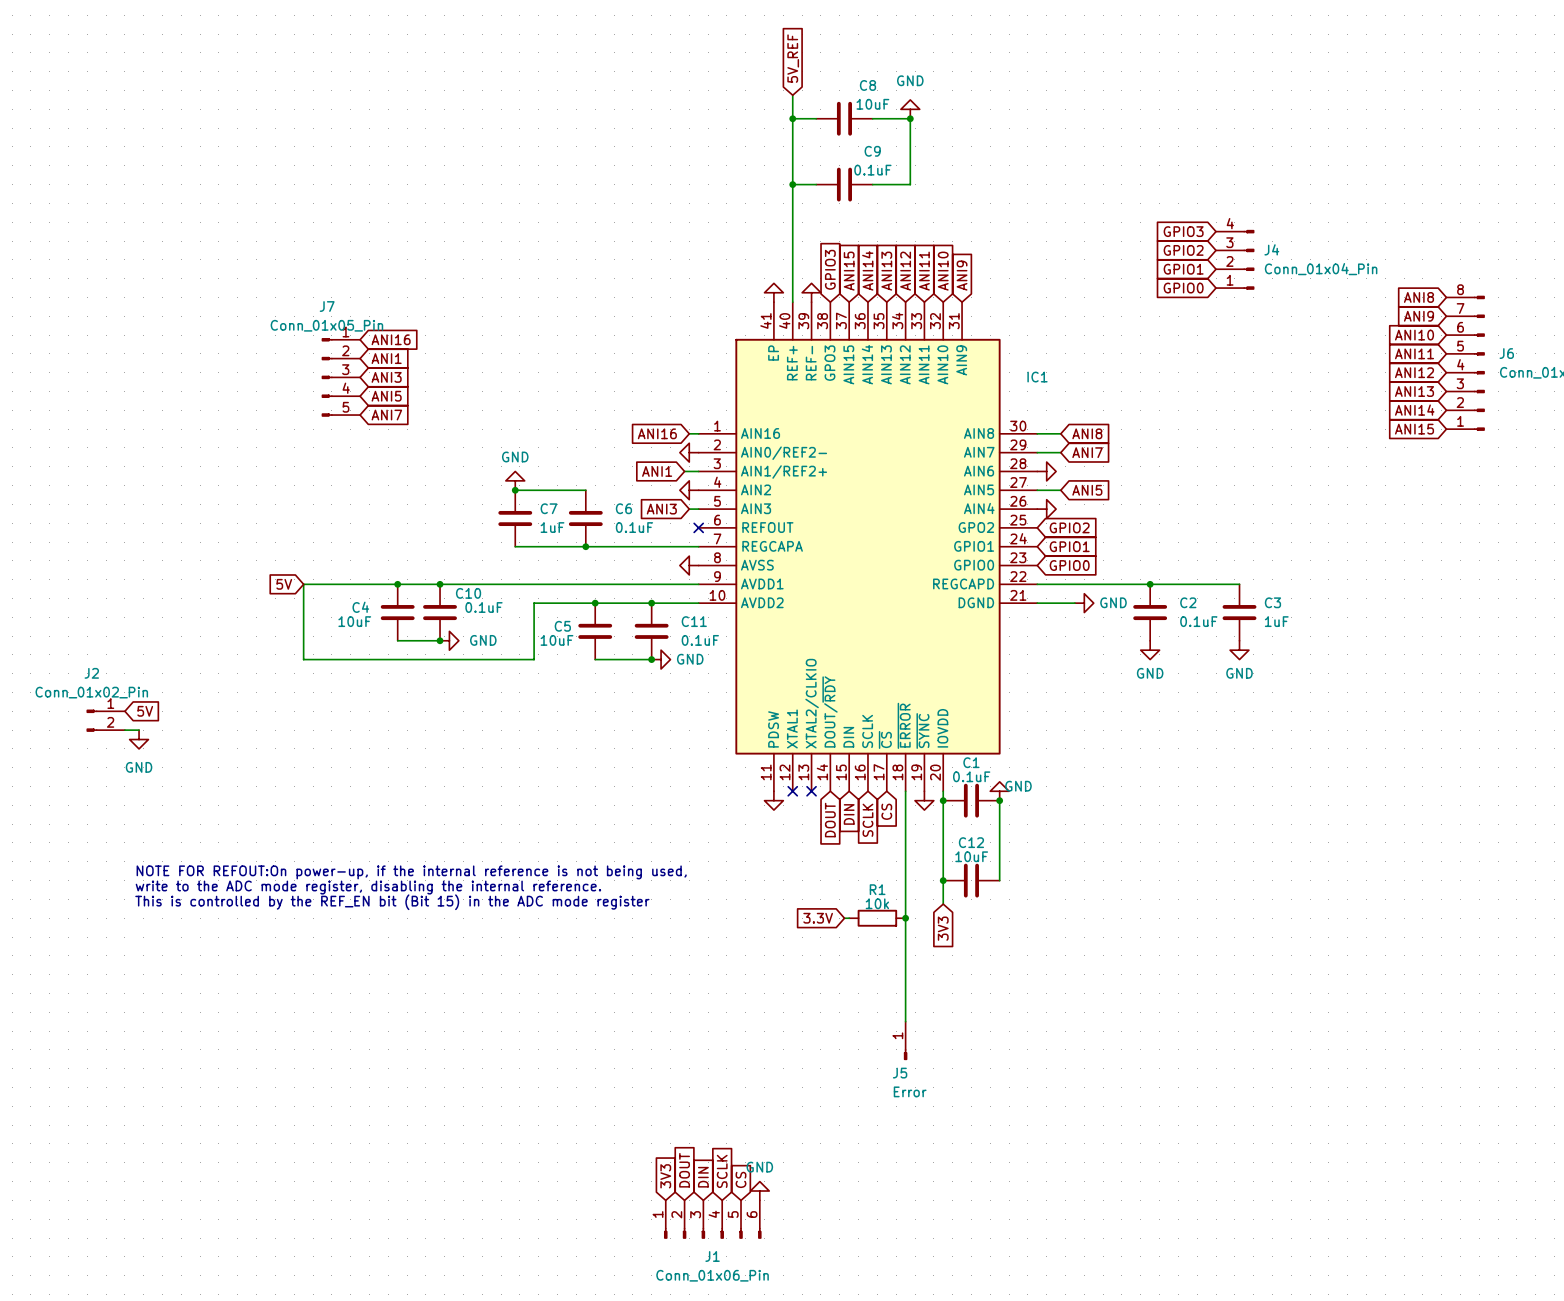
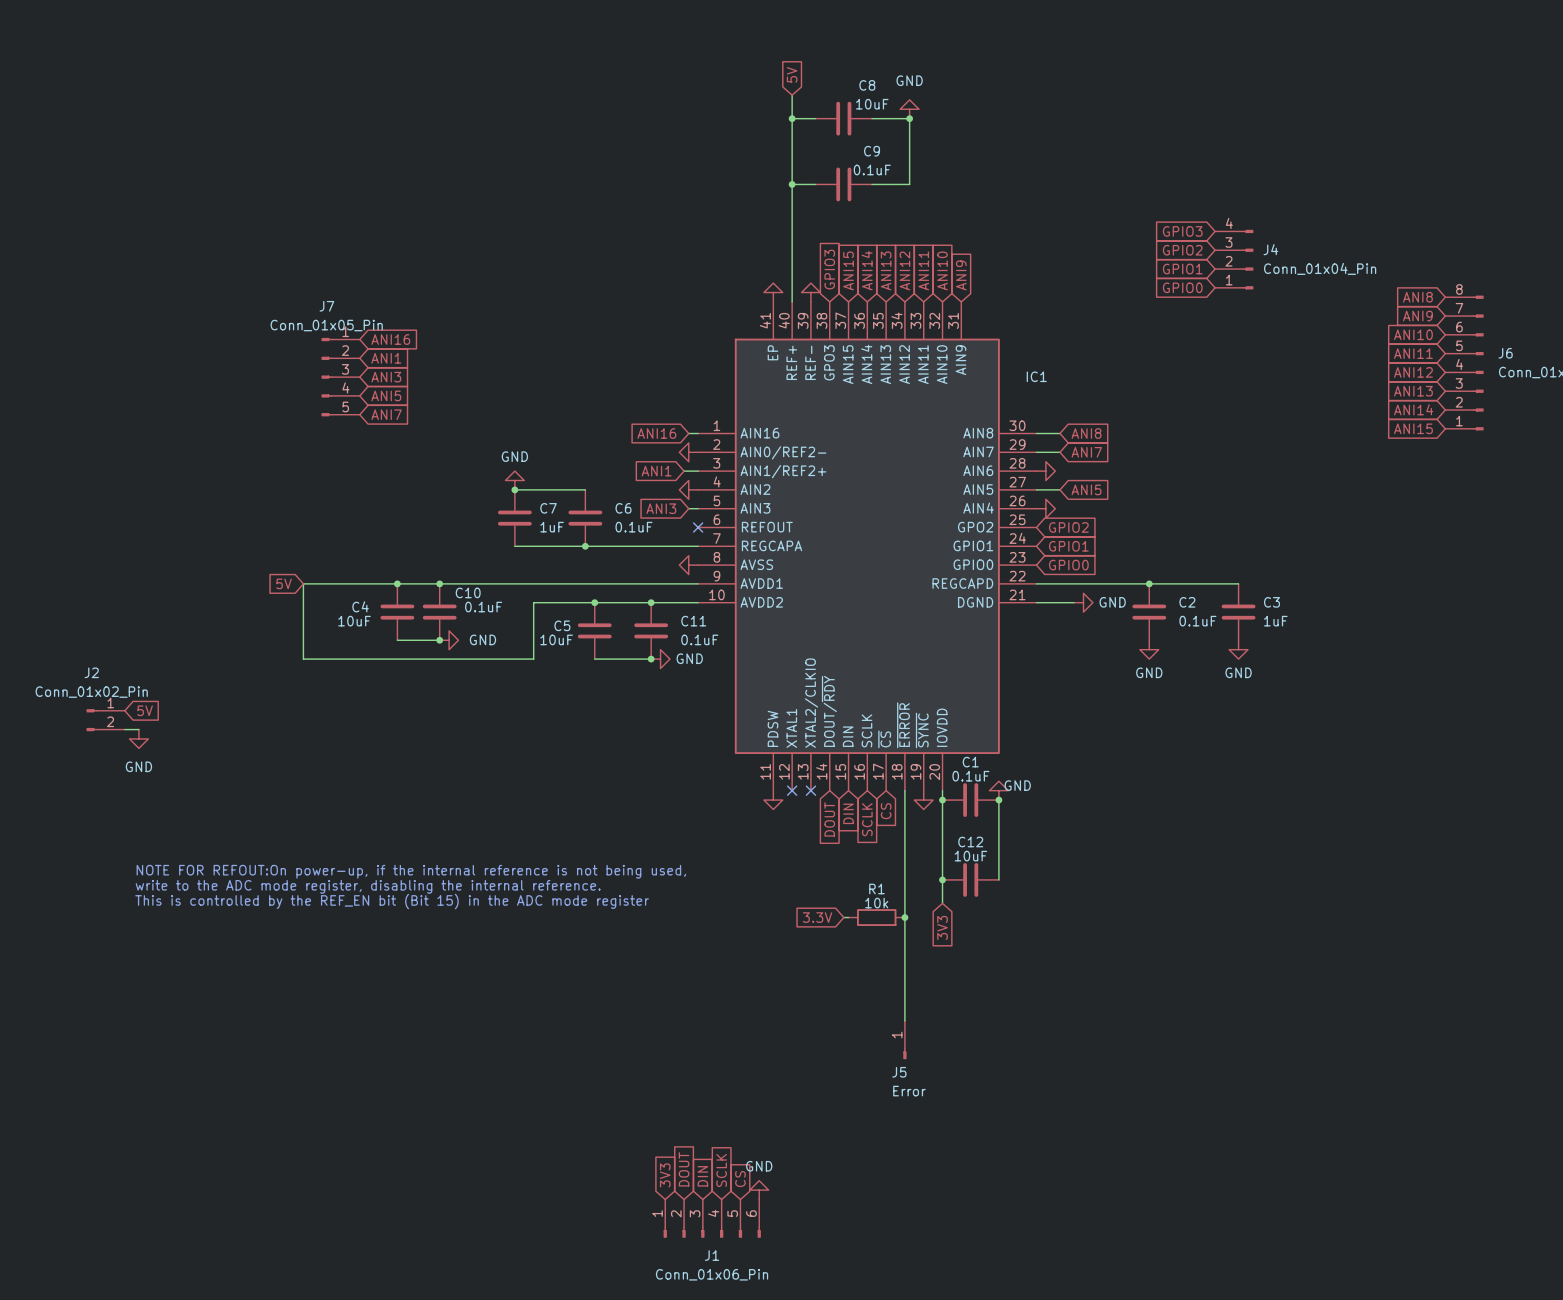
global label: 5V_REF (793, 58) -> 5V (792, 74)

